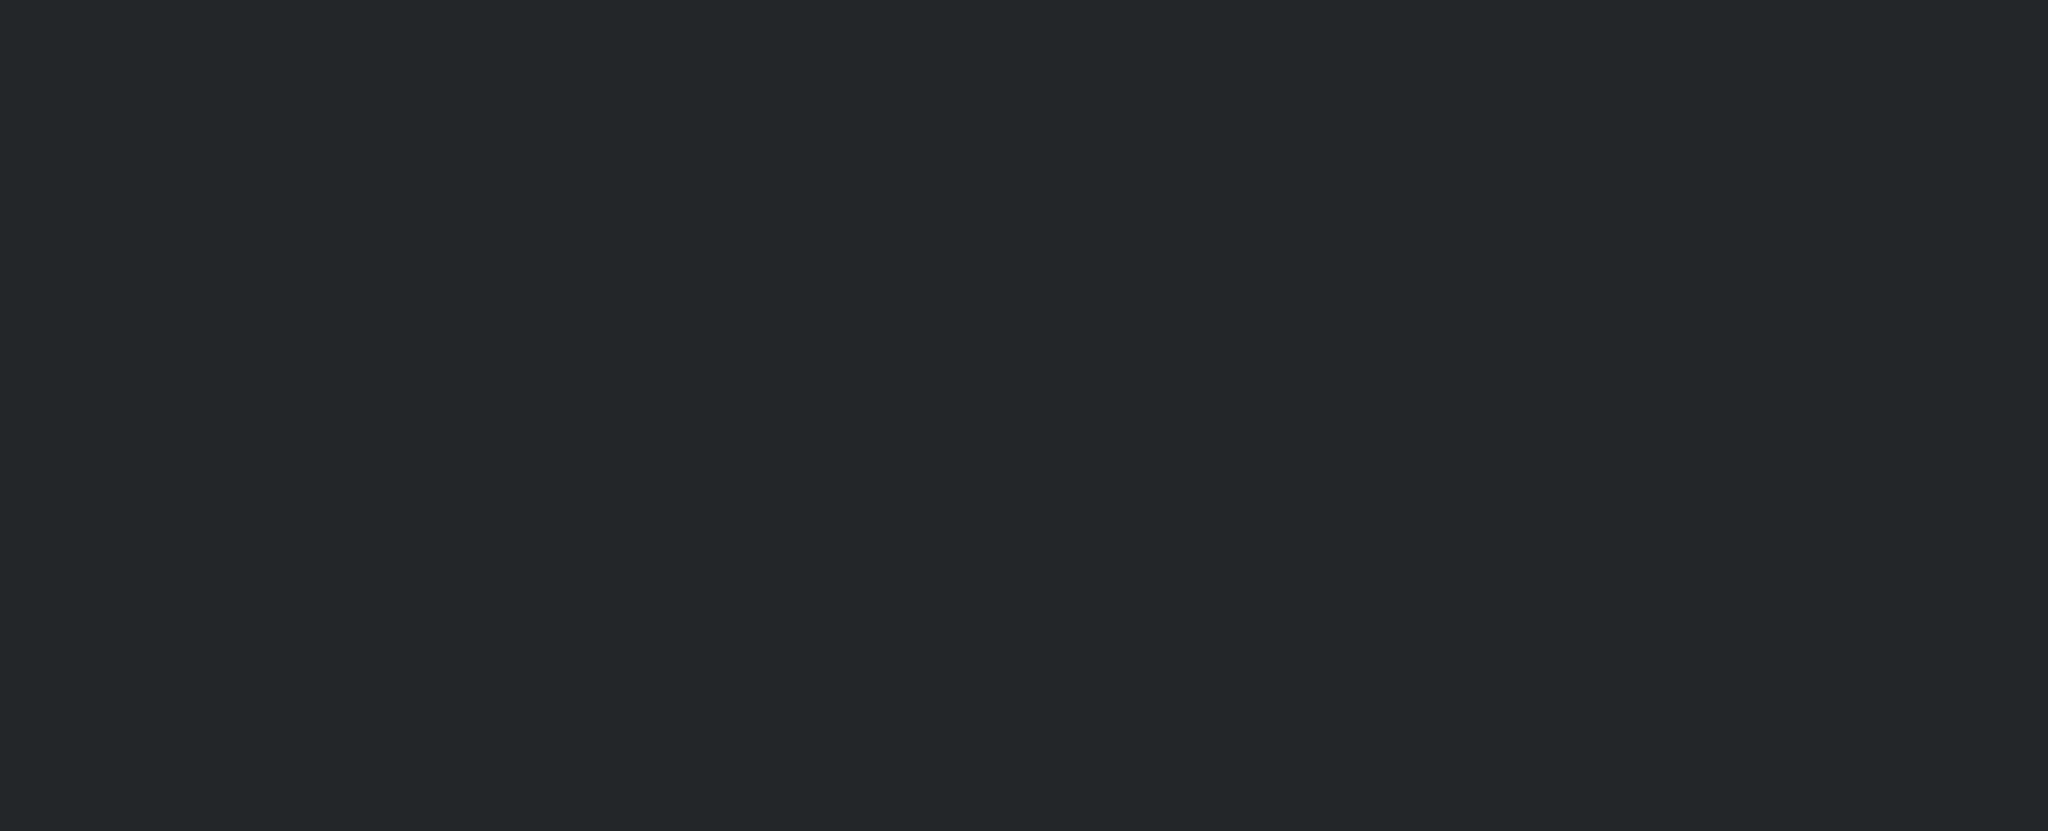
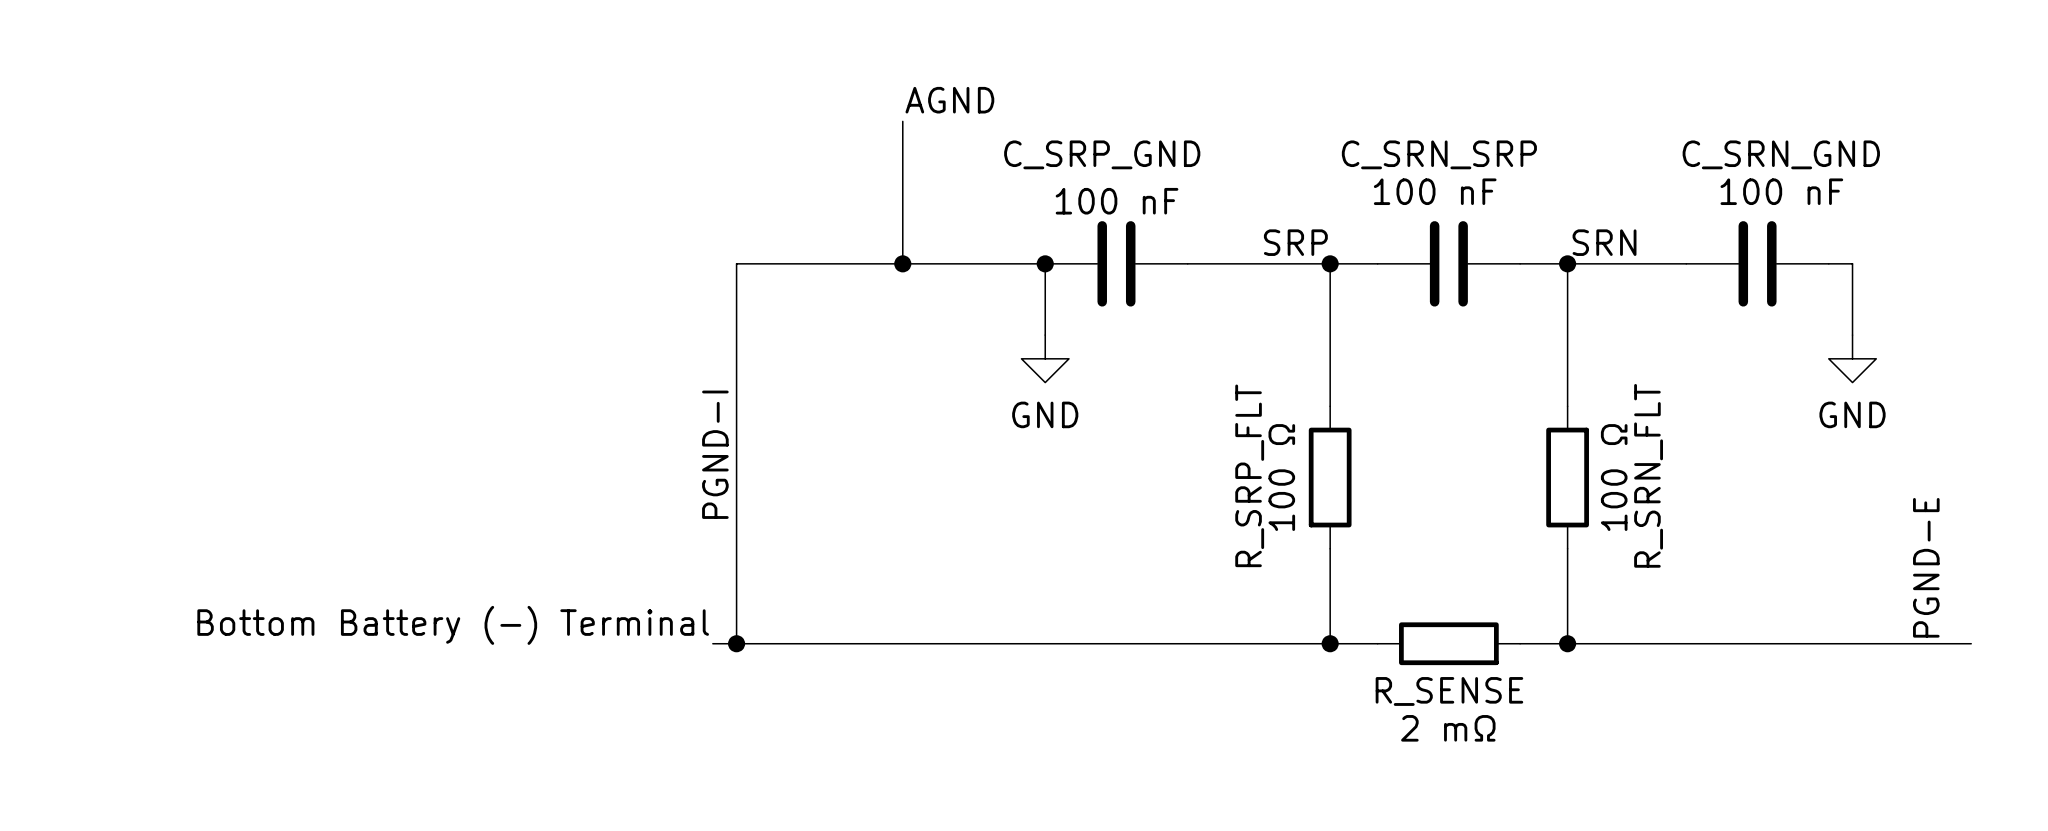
label: none -> AGND (949, 100)
wire: none -> (902, 121) (902, 263)
label: none -> SRP (1295, 242)
label: none -> SRN (1604, 242)
junction: none -> (902, 263)
junction: none -> (1045, 263)
C_SRP_GND: none -> 100 nF (1116, 263)
wire: none -> (1187, 263) (1377, 263)
wire: none -> (1330, 263) (1330, 406)
junction: none -> (1330, 263)
C_SRN_SRP: none -> 100 nF (1448, 263)
wire: none -> (1520, 263) (1686, 263)
wire: none -> (1567, 263) (1567, 406)
junction: none -> (1567, 263)
C_SRN_GND: none -> 100 nF (1757, 263)
wire: none -> (1828, 263) (1852, 263) (1852, 335)
wire: none -> (1045, 335) (1045, 263) (736, 263) (736, 643)
power symbol: none -> GND (1045, 358)
power symbol: none -> GND (1852, 358)
label: none -> PGND-I (715, 454)
R_SRP_FLT: none -> 100 Ω (1330, 477)
R_SRN_FLT: none -> 100 Ω (1567, 477)
wire: none -> (1330, 548) (1330, 643)
wire: none -> (1567, 548) (1567, 643)
label: none -> PGND-E (1926, 567)
label: none -> Bottom Battery (-) Terminal (453, 625)
wire: none -> (712, 643) (1377, 643)
junction: none -> (736, 643)
junction: none -> (1330, 643)
R_SENSE: none -> 2 mΩ (1448, 643)
wire: none -> (1520, 643) (1971, 643)
junction: none -> (1567, 643)

